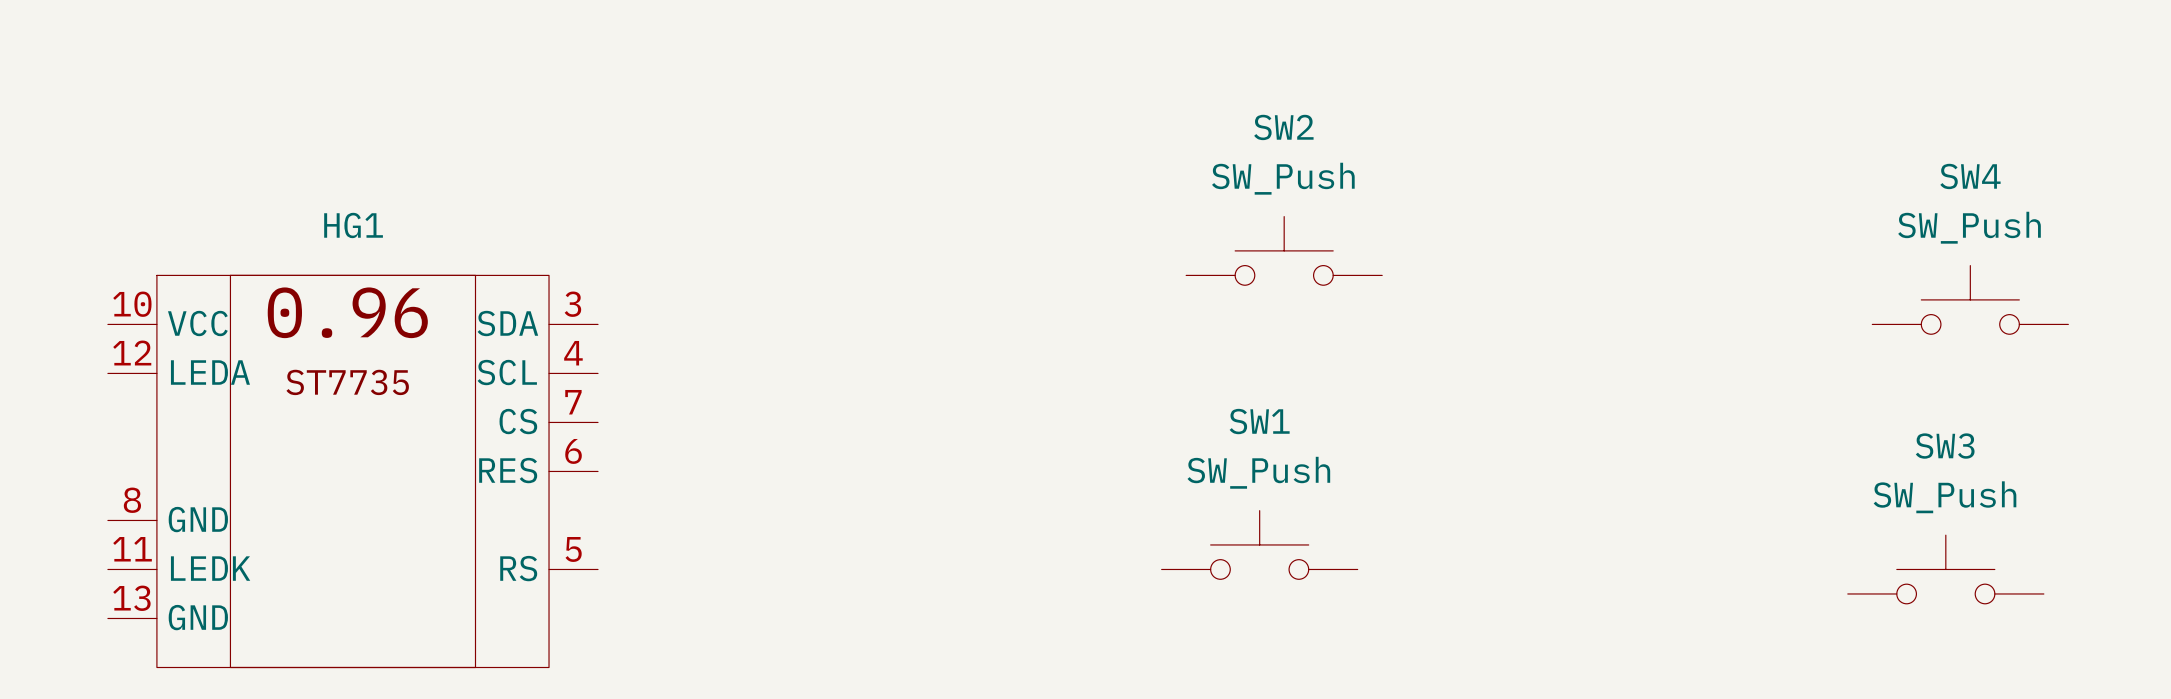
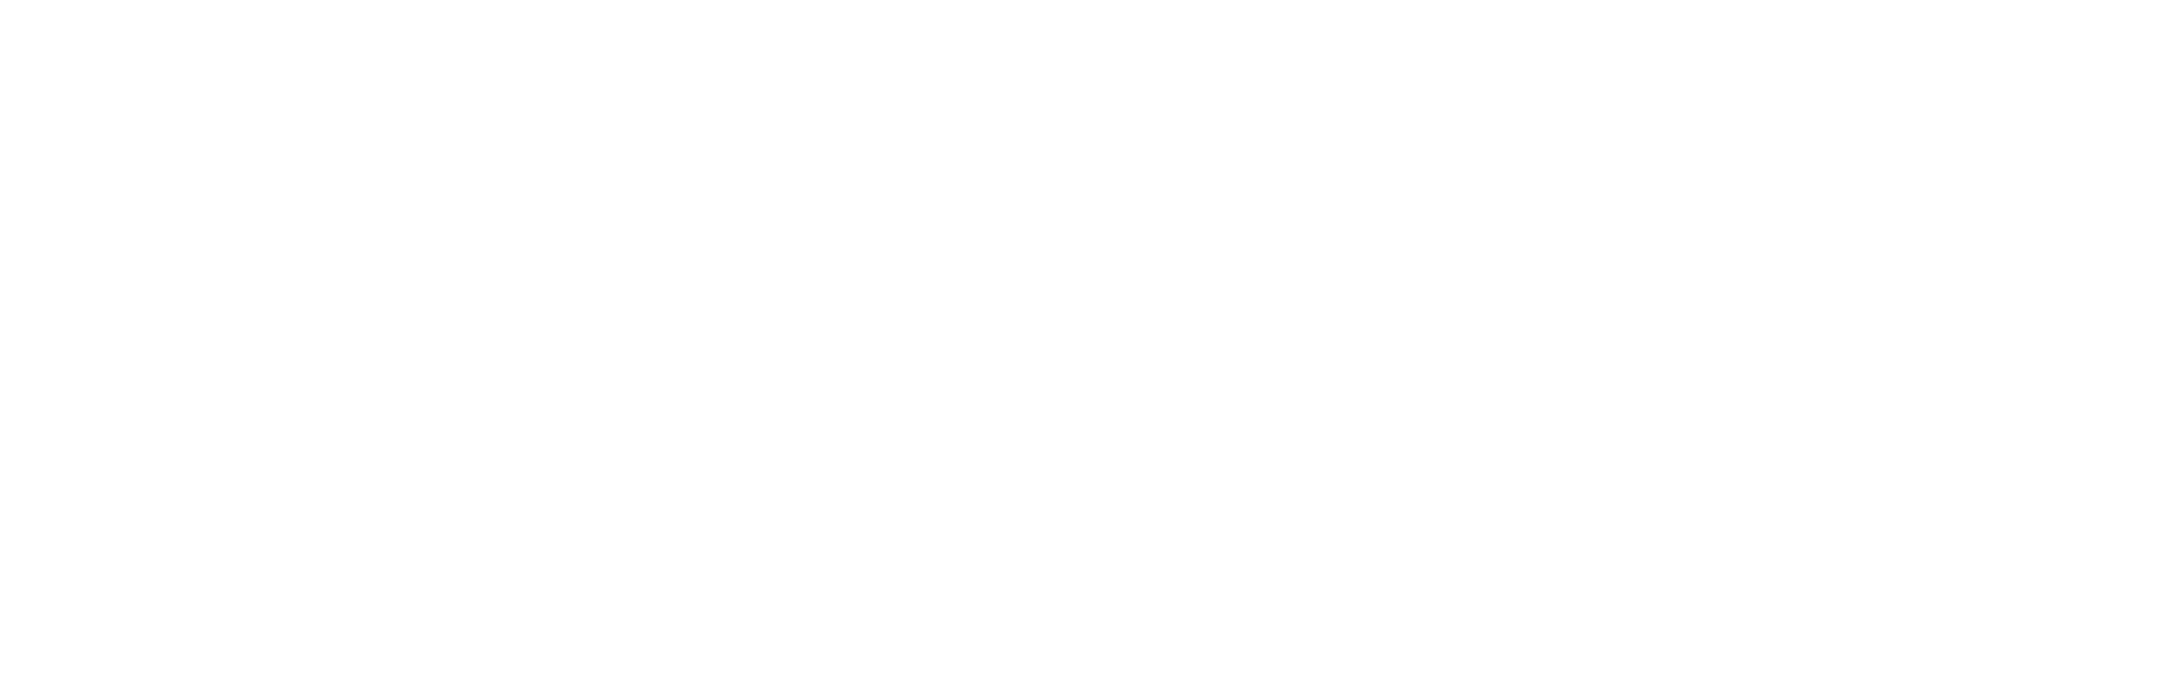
SW2: SW_Push (1284, 250) -> none
SW4: SW_Push (1970, 299) -> none
HG1: (352, 471) -> none
SW1: SW_Push (1259, 544) -> none
SW3: SW_Push (1945, 569) -> none

